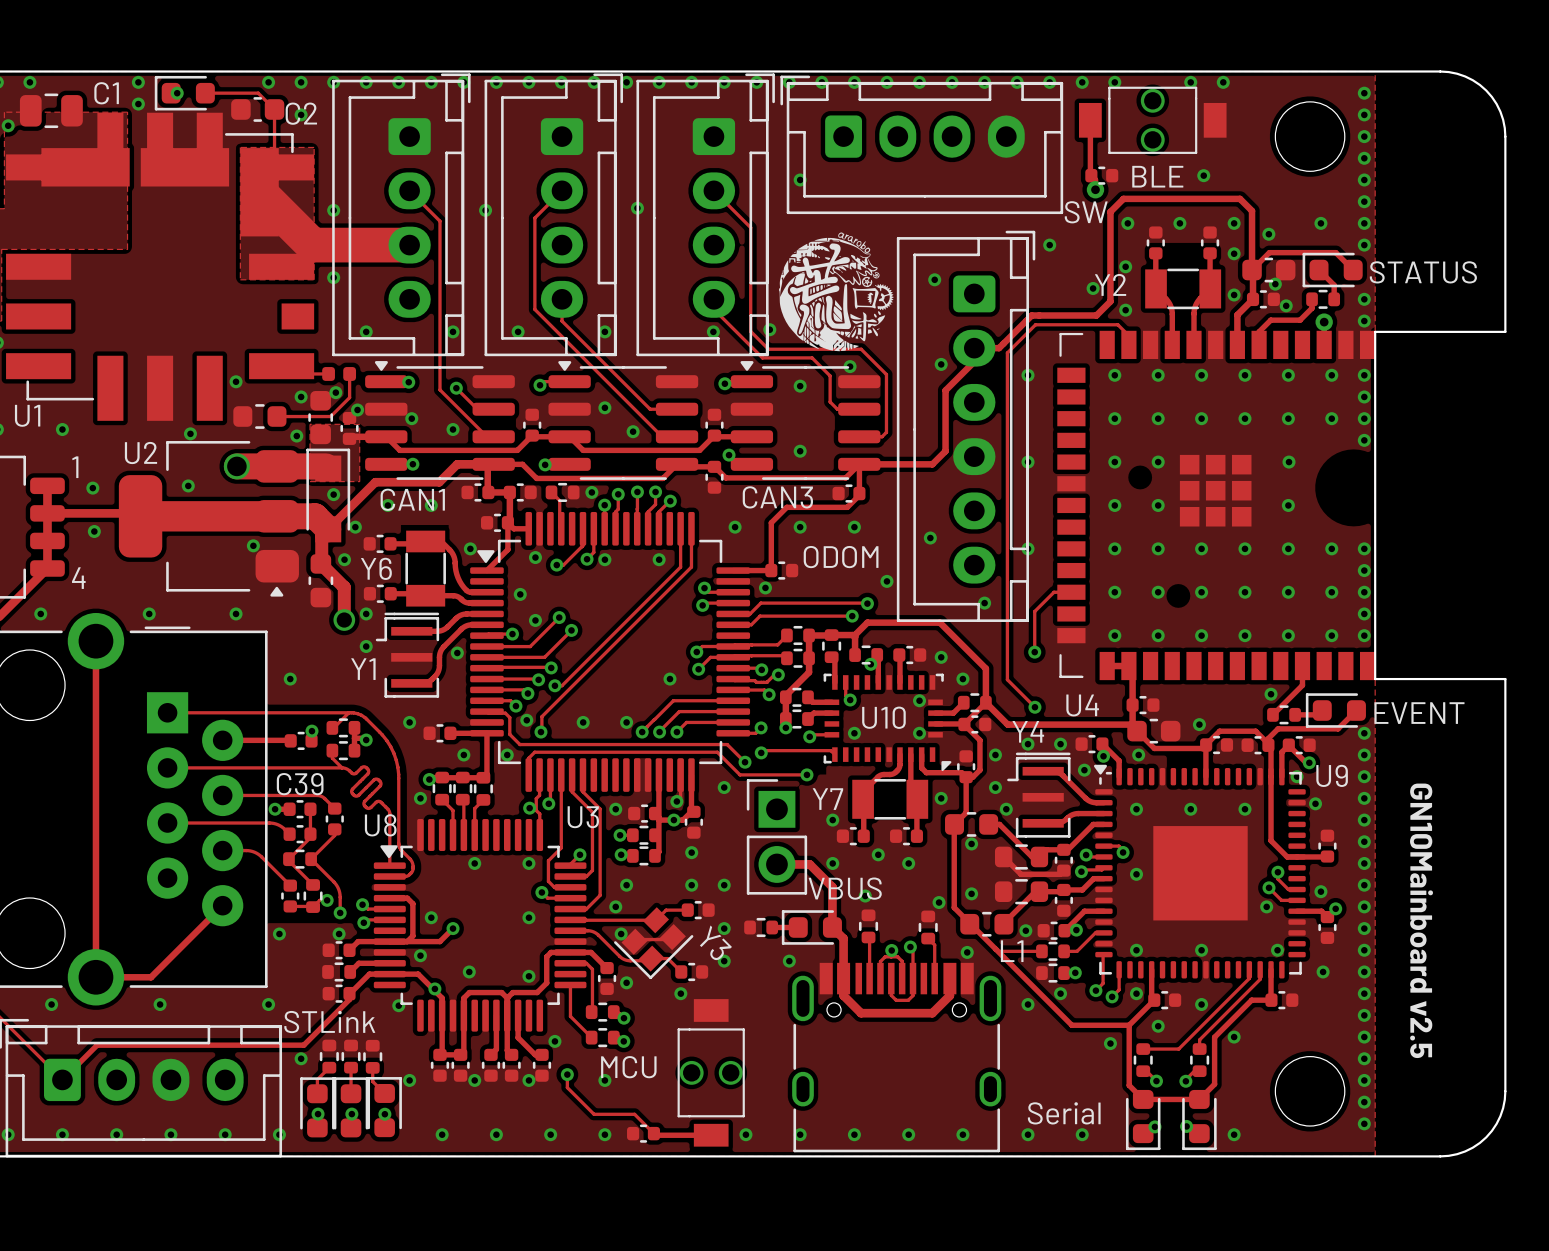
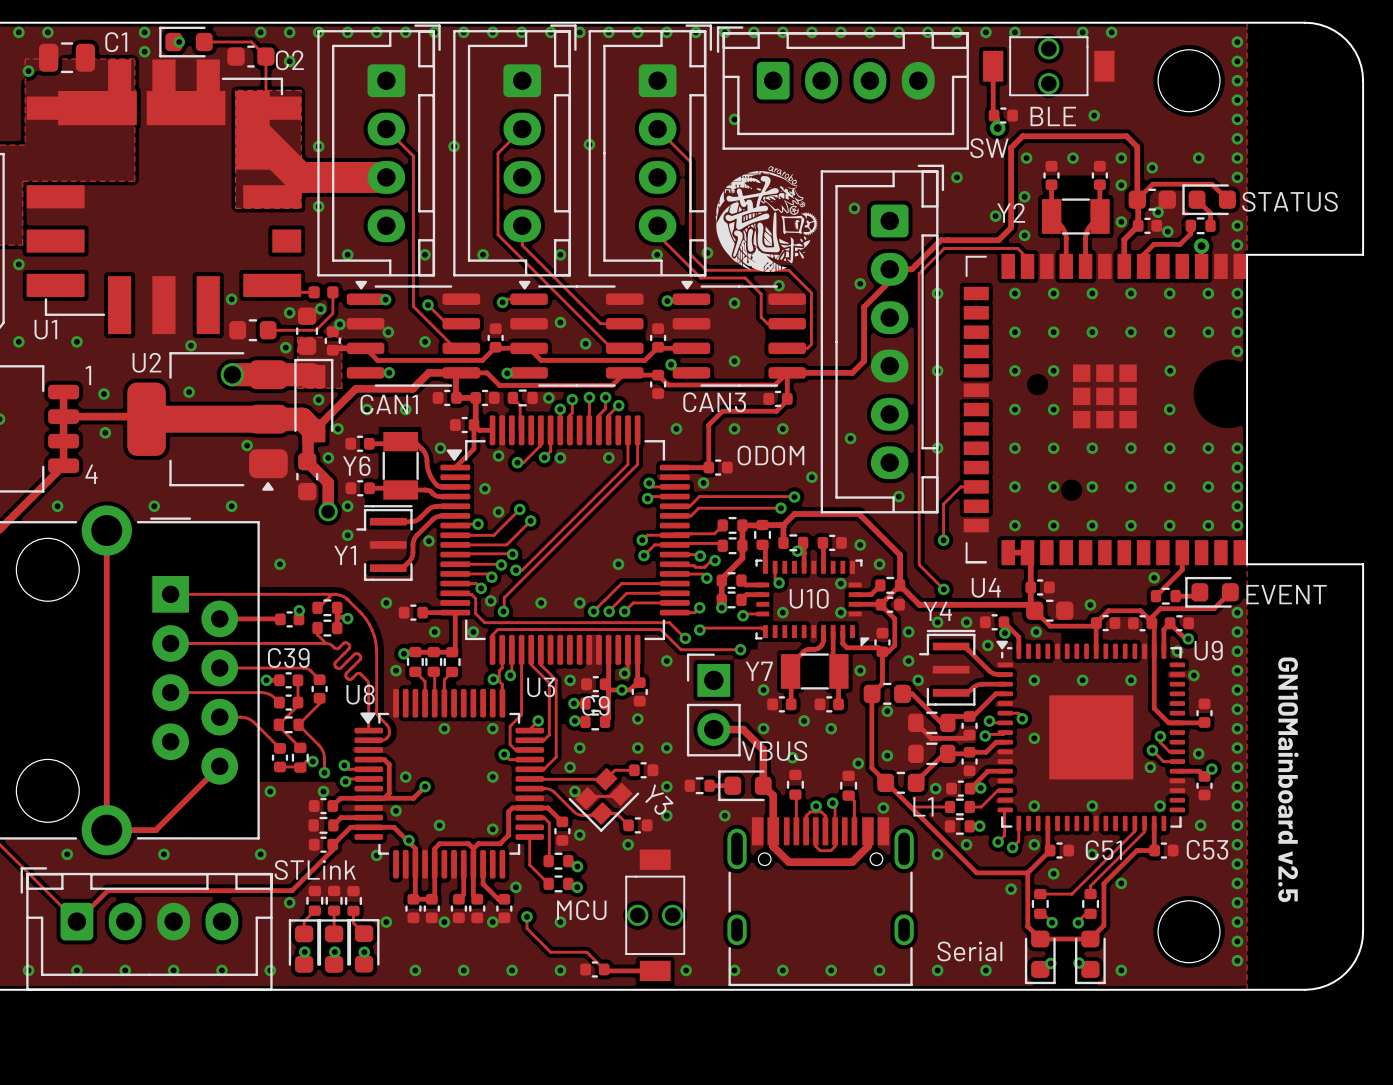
C9 name: none -> C9 (595, 705)
C51 name: none -> C51 (1103, 850)
C53 name: none -> C53 (1207, 849)

